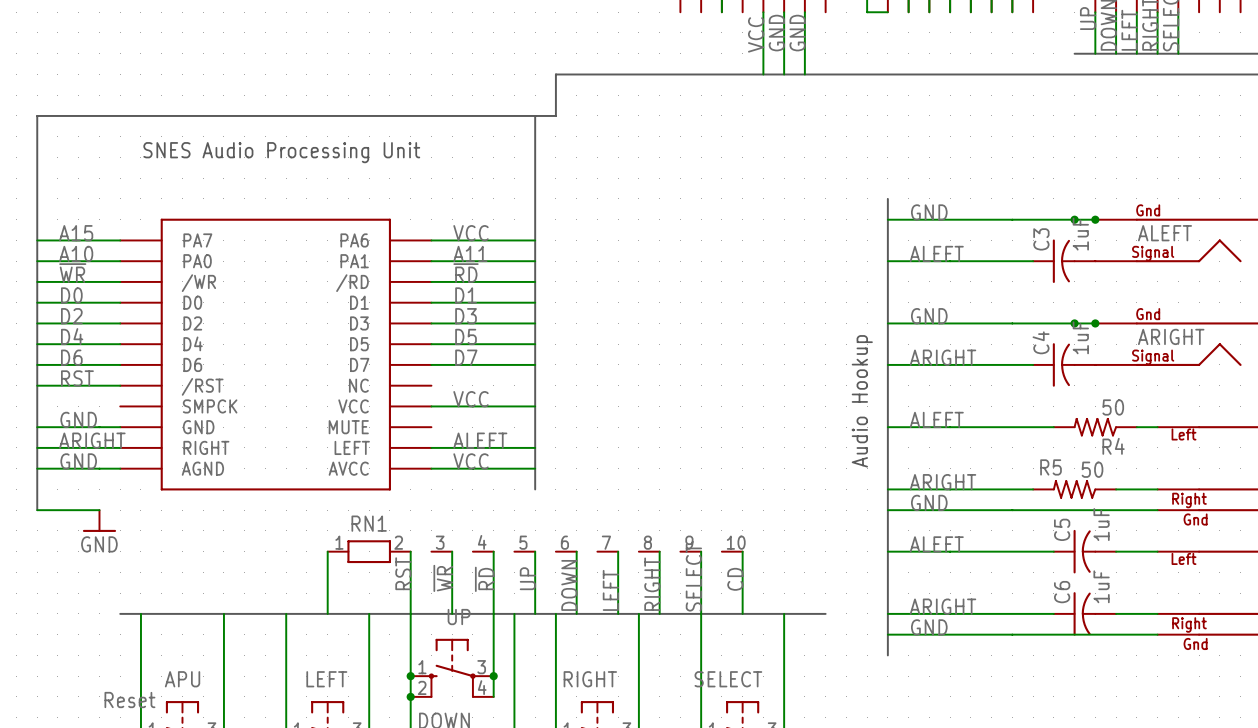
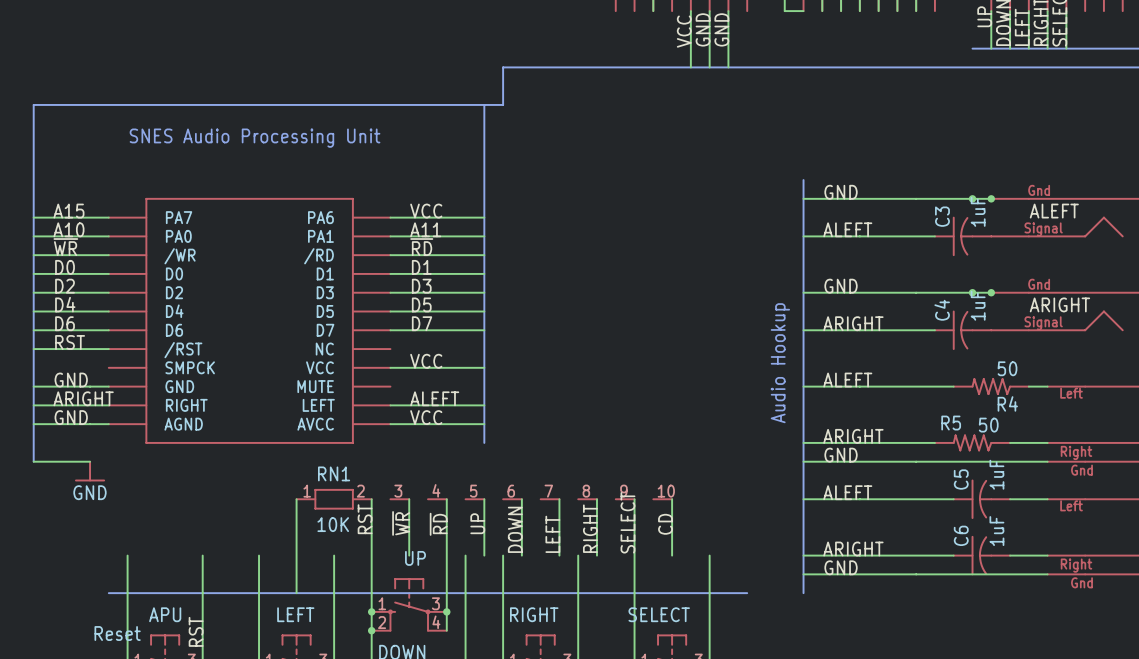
RN1 value: none -> 10K (333, 524)
bus: (120, 613) (825, 613) -> (108, 593) (747, 593)
wire: none -> (296, 555) (296, 593)
label: none -> RST (196, 631)

